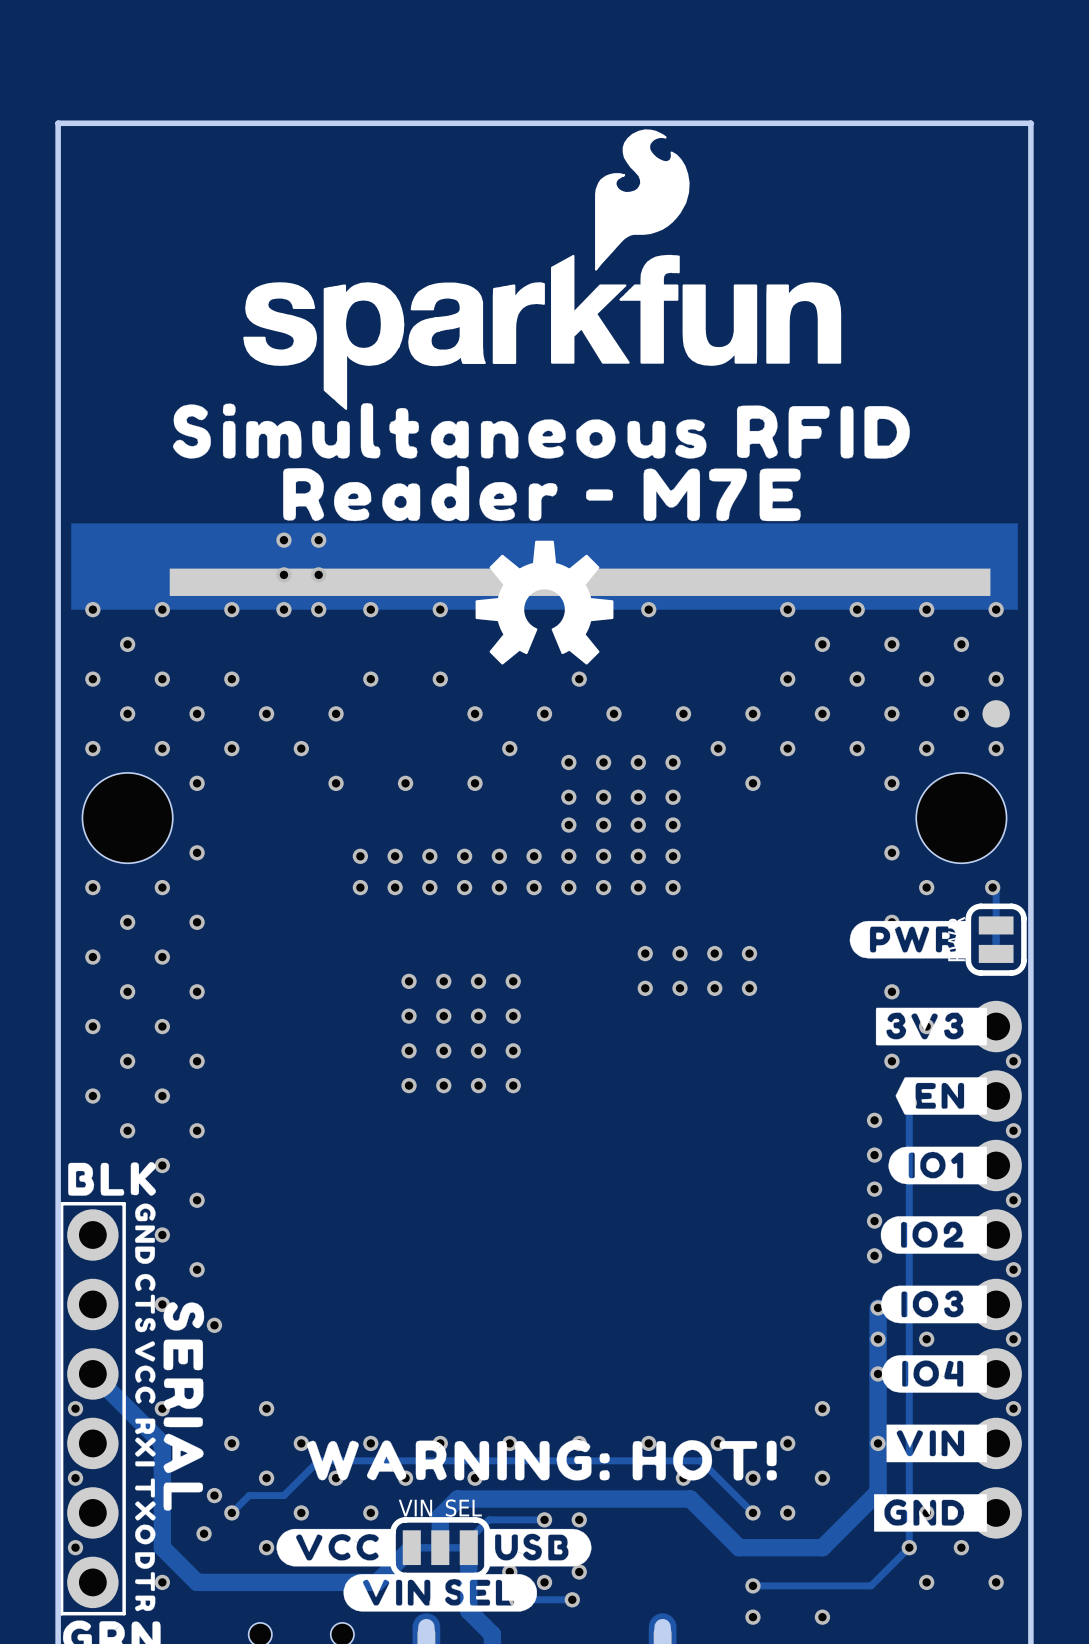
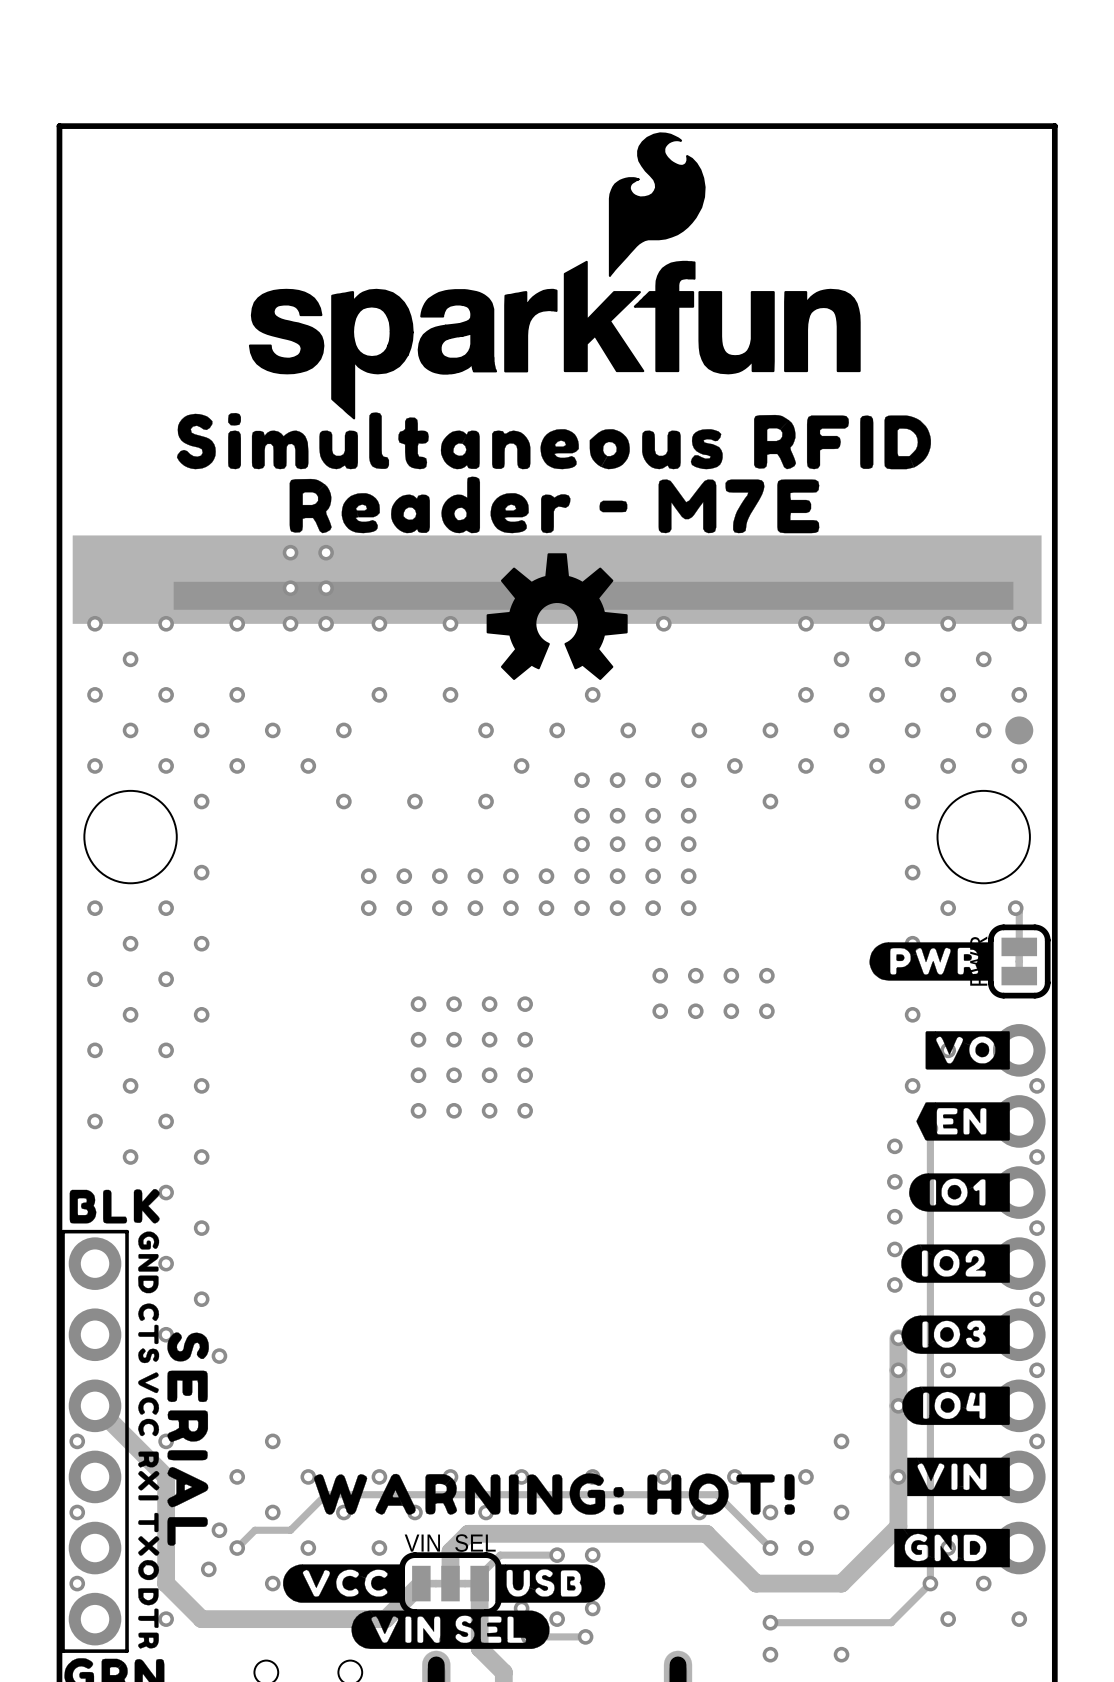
drawing shape: [875, 1007, 987, 1046] -> [925, 1031, 1010, 1070]

